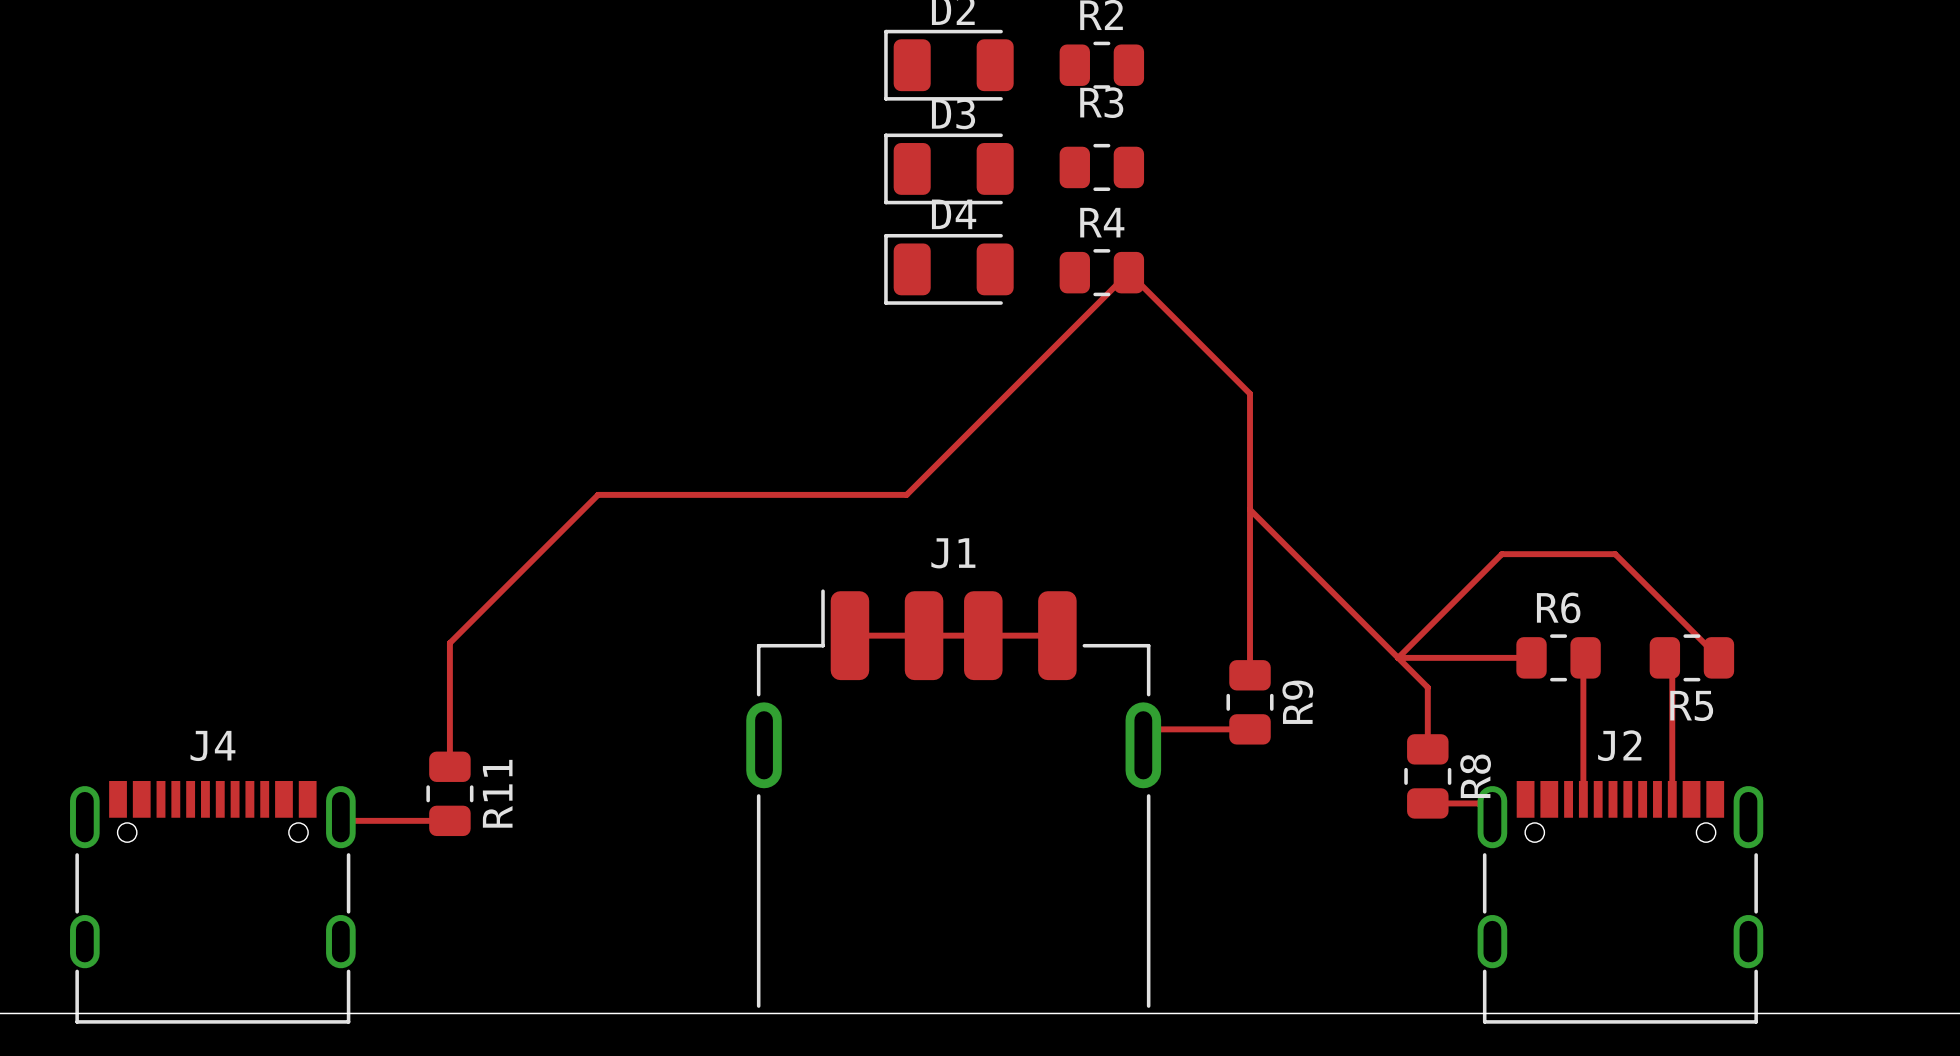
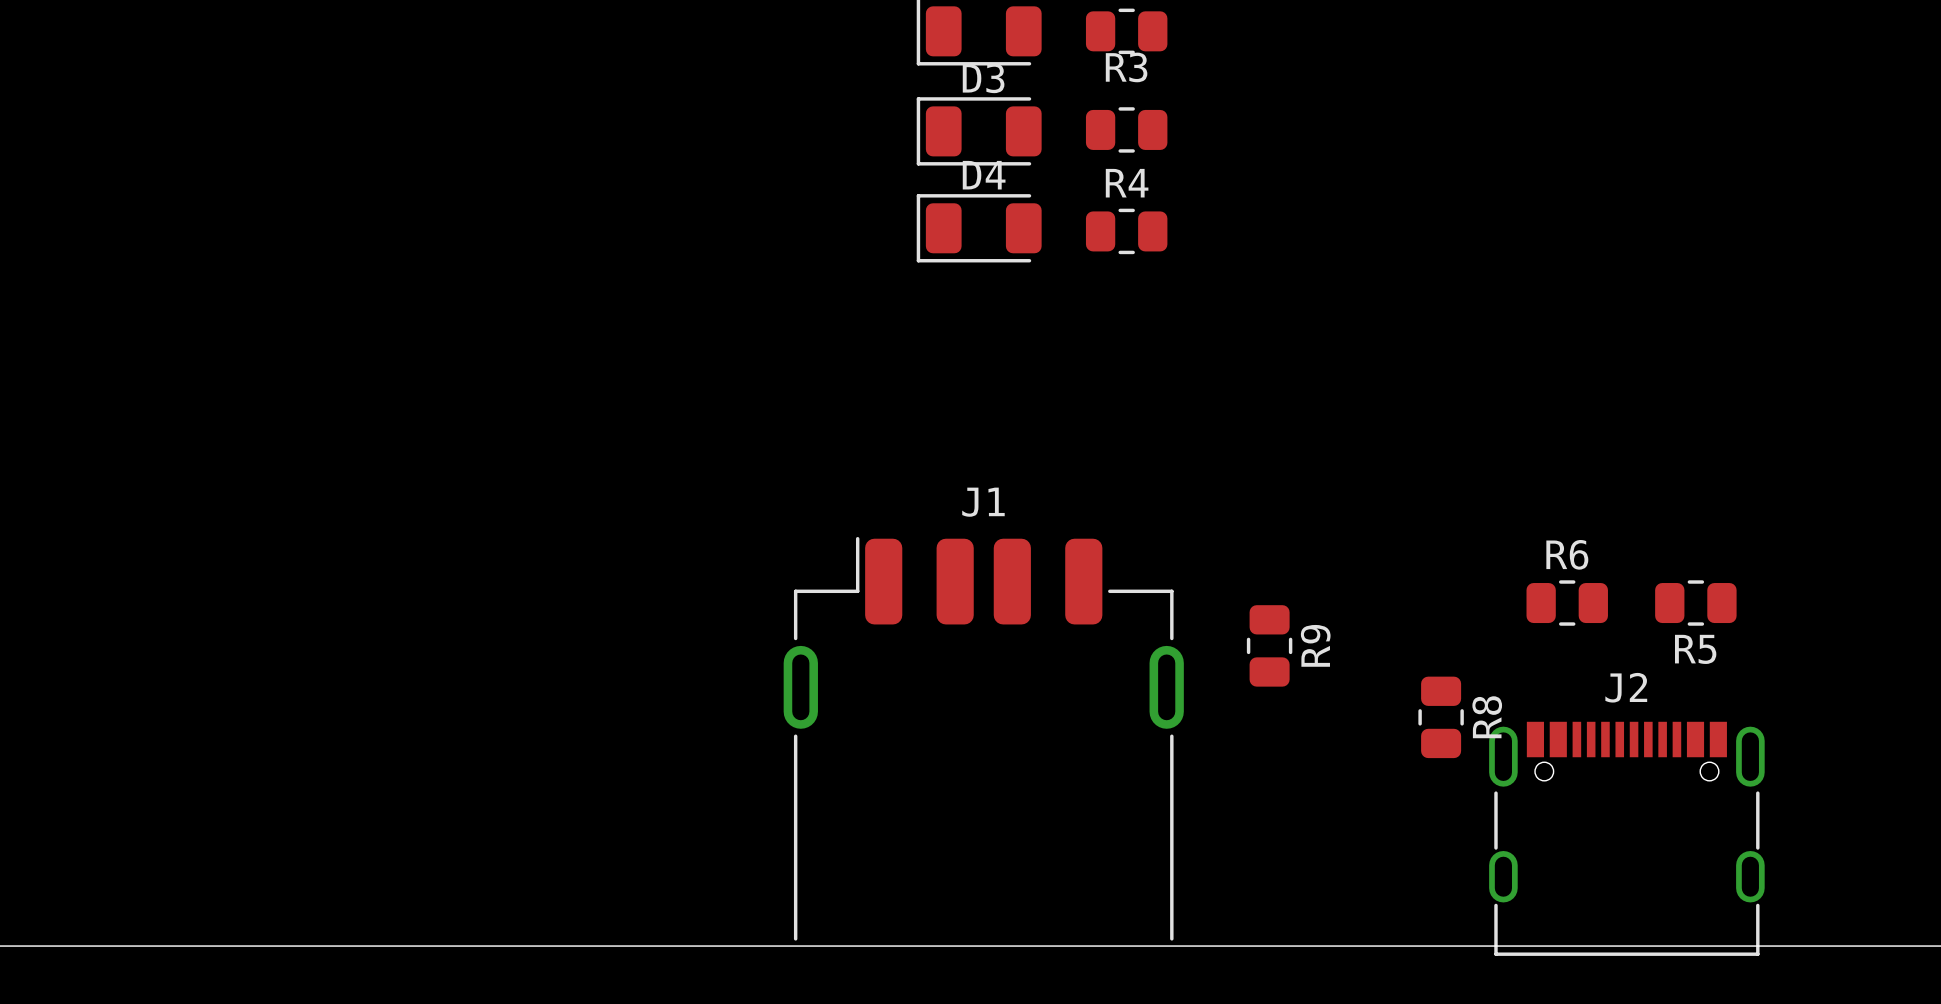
track: (1250, 509) (1427, 687) (1427, 749) -> none
track: (849, 635) (1057, 635) -> none
track: (1531, 657) (1398, 657) (1501, 554) (1615, 554) (1718, 657) -> none
track: (1585, 657) (1583, 660) (1583, 799) -> none
track: (1664, 657) (1672, 665) (1672, 799) -> none
track: (1250, 675) (1250, 393) (1128, 272) (906, 494) (598, 494) (449, 643) (449, 766) -> none
track: (1250, 729) (1159, 729) (1143, 745) -> none
R11: (449, 793) -> none
track: (1427, 803) (1478, 803) (1492, 817) -> none
track: (340, 817) (344, 820) (449, 820) -> none
J4: (212, 902) -> none

